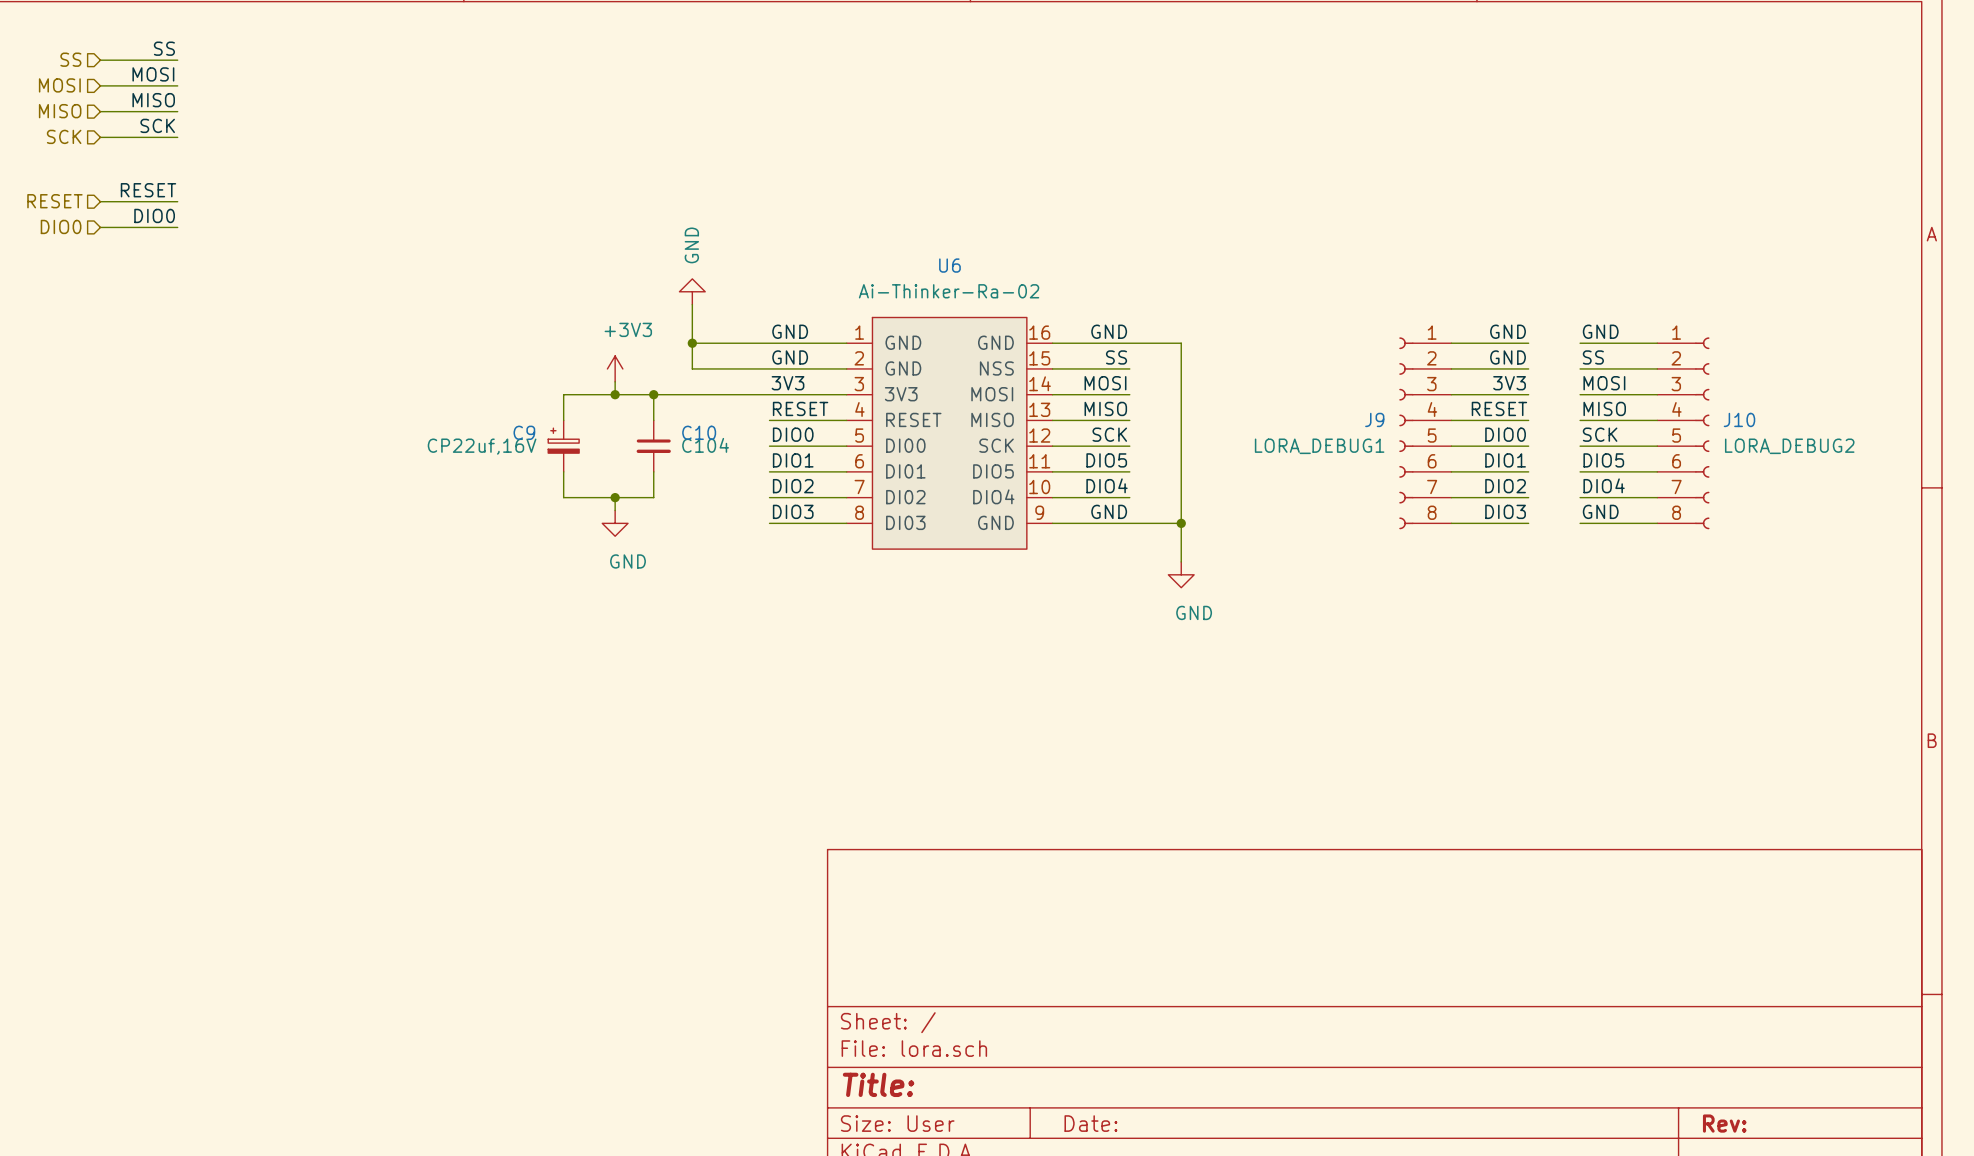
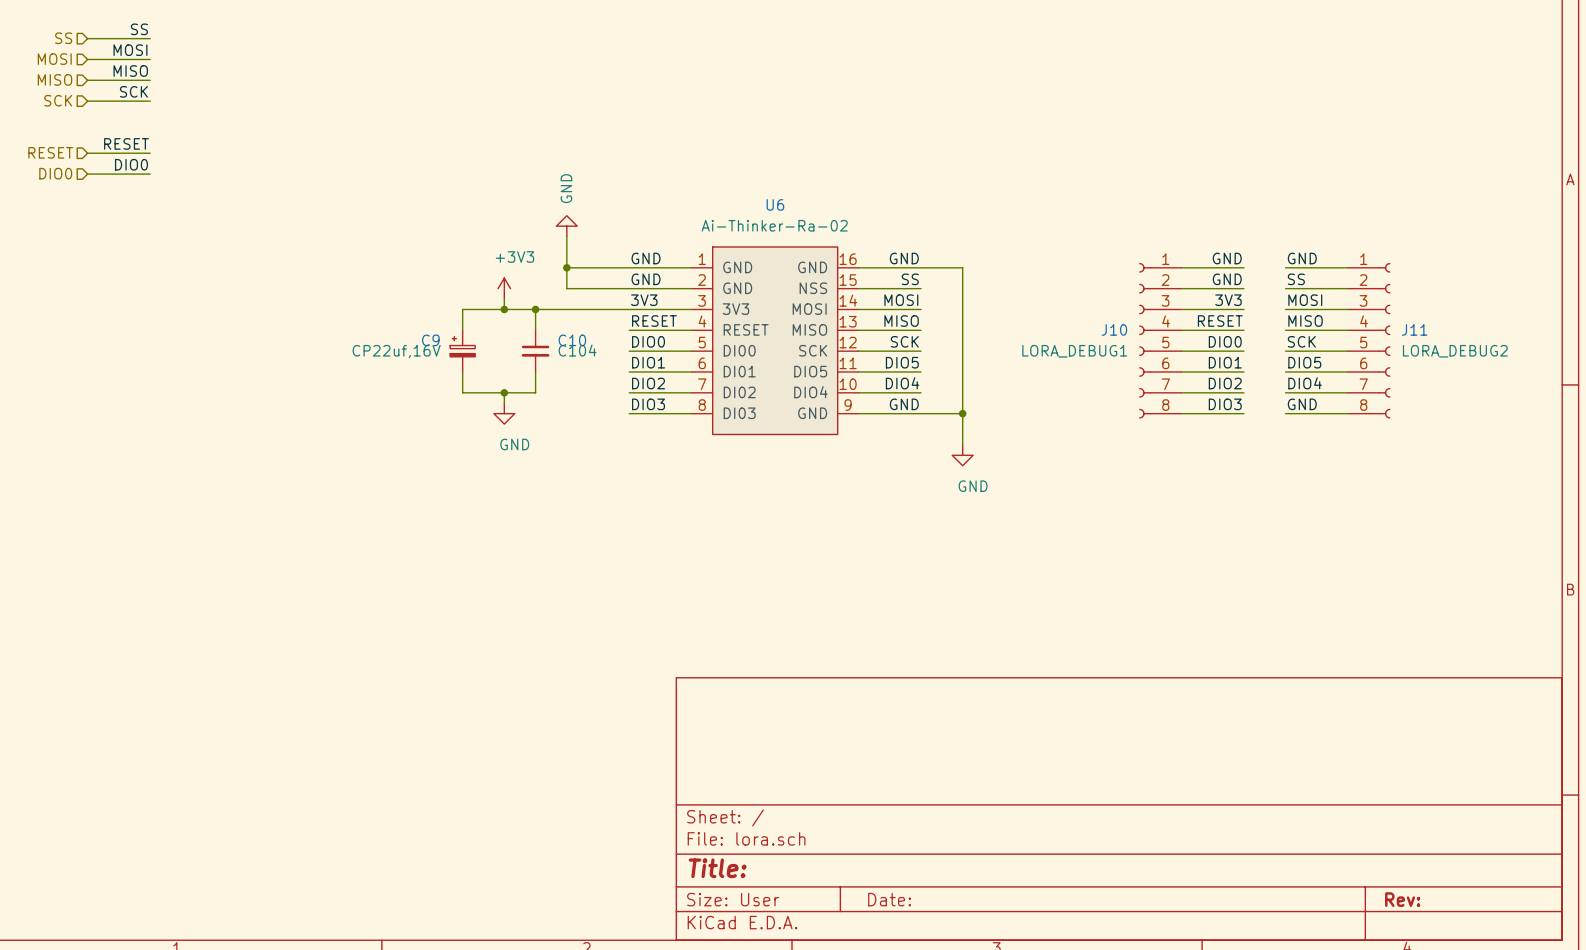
J9 name: J9 (1374, 419) -> J10 (1114, 329)
J10 name: J10 (1739, 419) -> J11 (1414, 329)

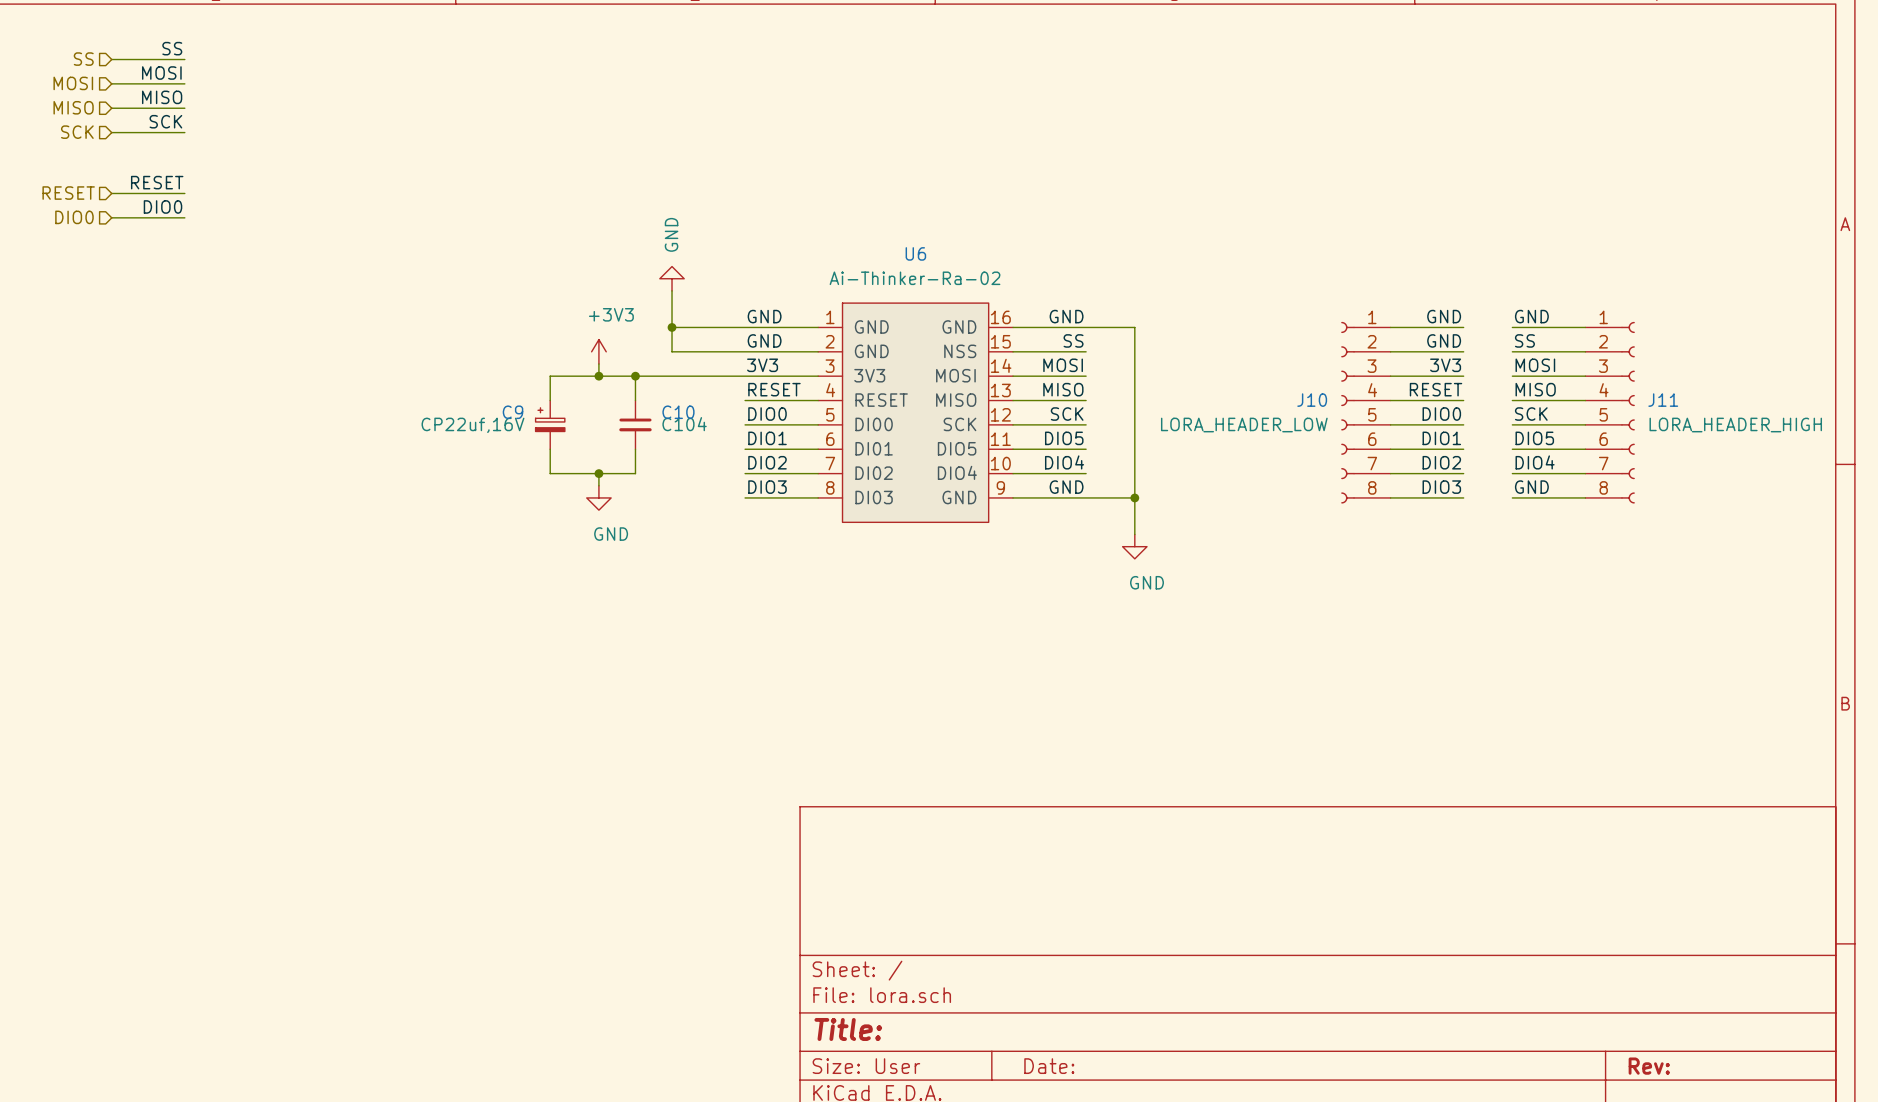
J10 value: LORA_DEBUG1 (1074, 351) -> LORA_HEADER_LOW (1244, 425)
J11 value: LORA_DEBUG2 (1455, 351) -> LORA_HEADER_HIGH (1735, 425)

